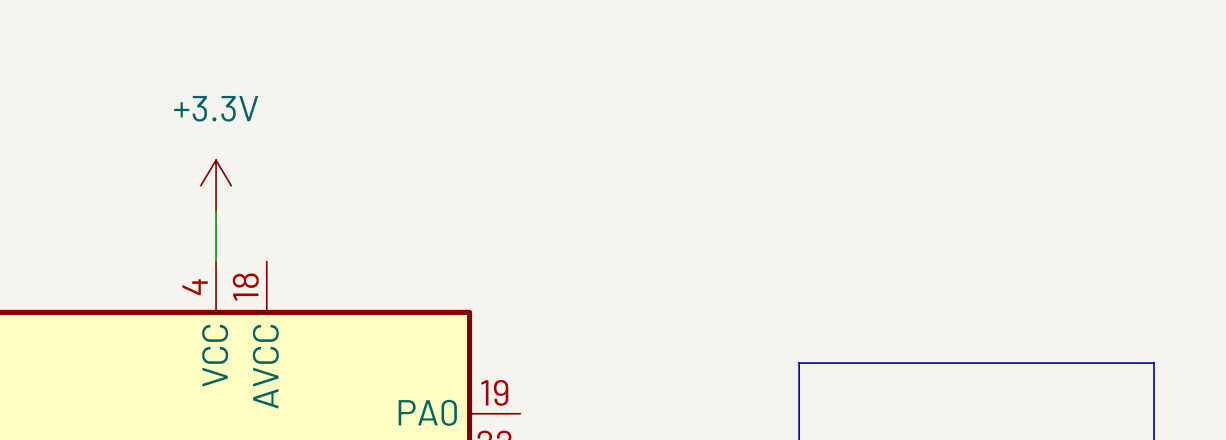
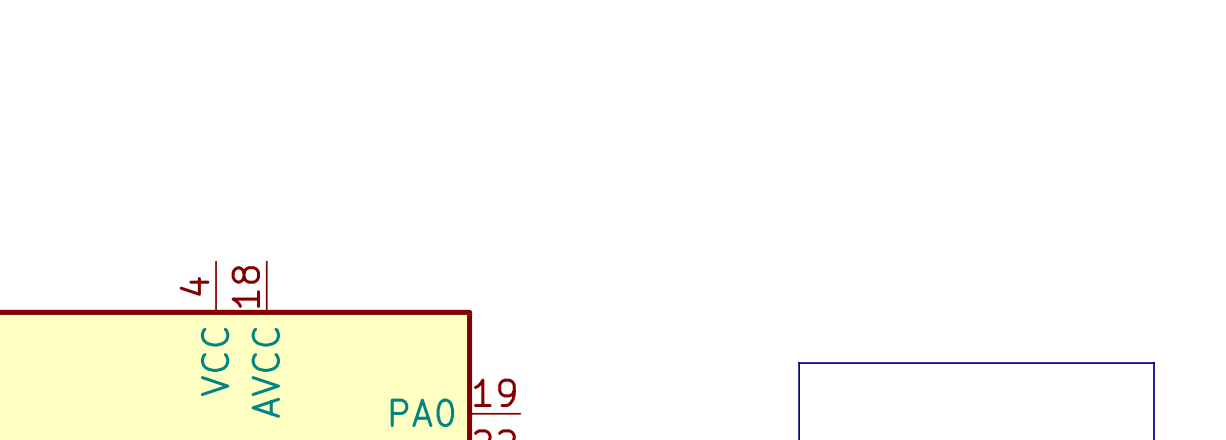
power symbol: +3.3V (216, 185) -> none
wire: (216, 210) (216, 261) -> none

